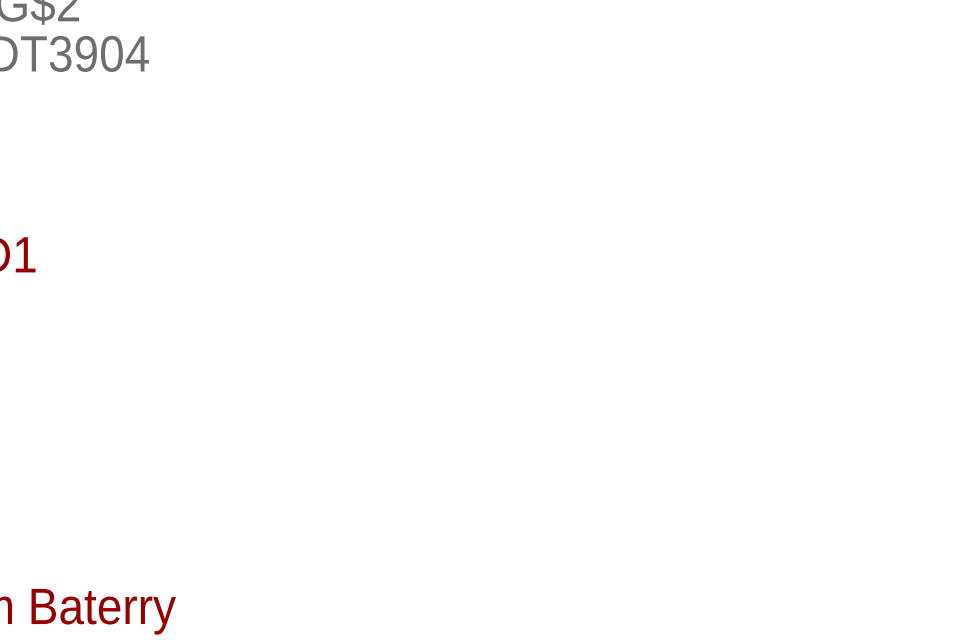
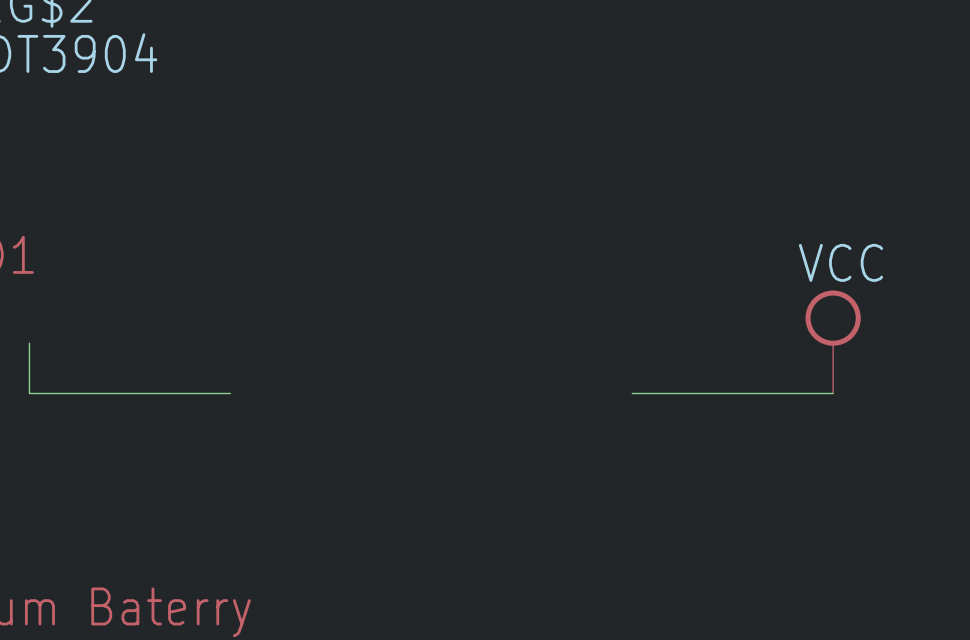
power symbol: none -> VCC (833, 342)
wire: none -> (29, 343) (29, 393) (230, 393)
wire: none -> (632, 393) (833, 393)

